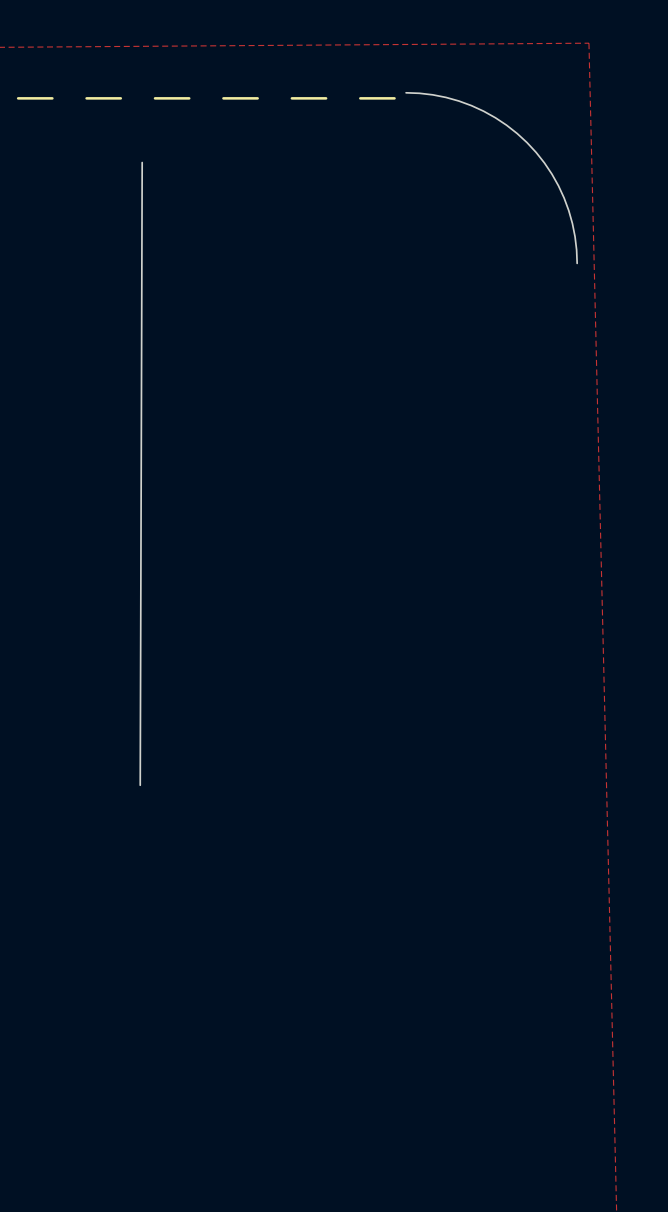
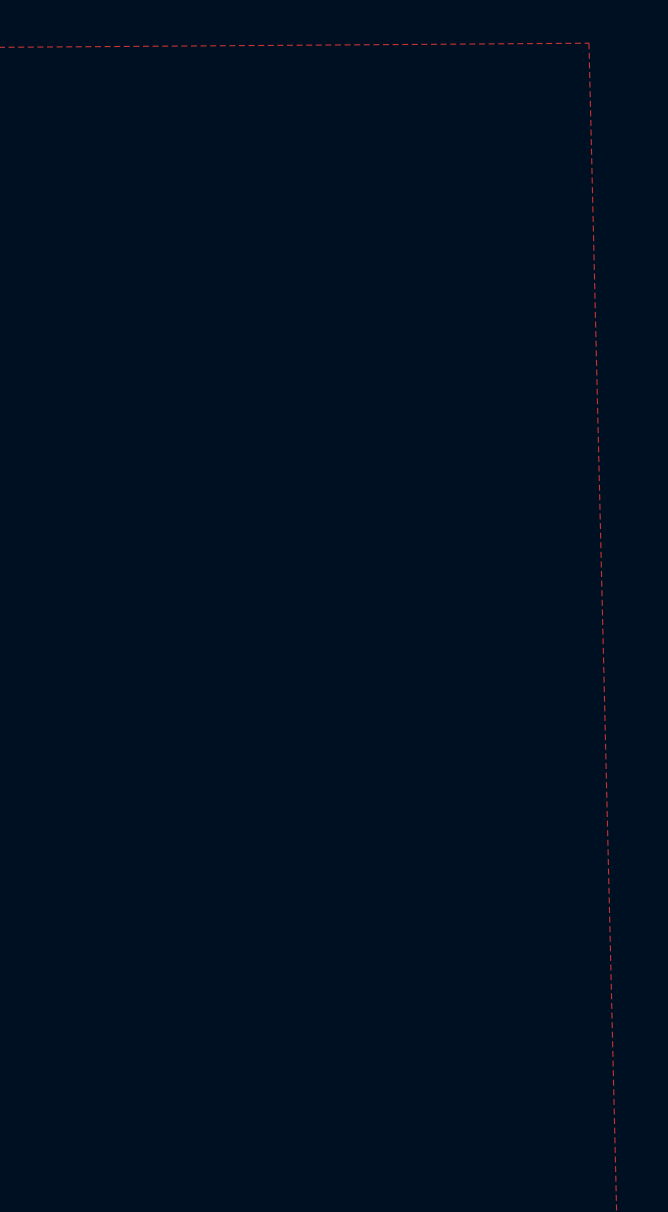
board edge: (406, 92) (432, 94) (471, 105) (495, 117) (527, 142) (551, 174) (564, 198) (575, 236) (577, 263) -> none
line: (18, 98) (52, 98) -> none
line: (86, 98) (120, 98) -> none
line: (155, 98) (189, 98) -> none
line: (223, 98) (257, 98) -> none
line: (291, 98) (326, 98) -> none
line: (360, 98) (394, 98) -> none
board edge: (142, 162) (140, 785) -> none

